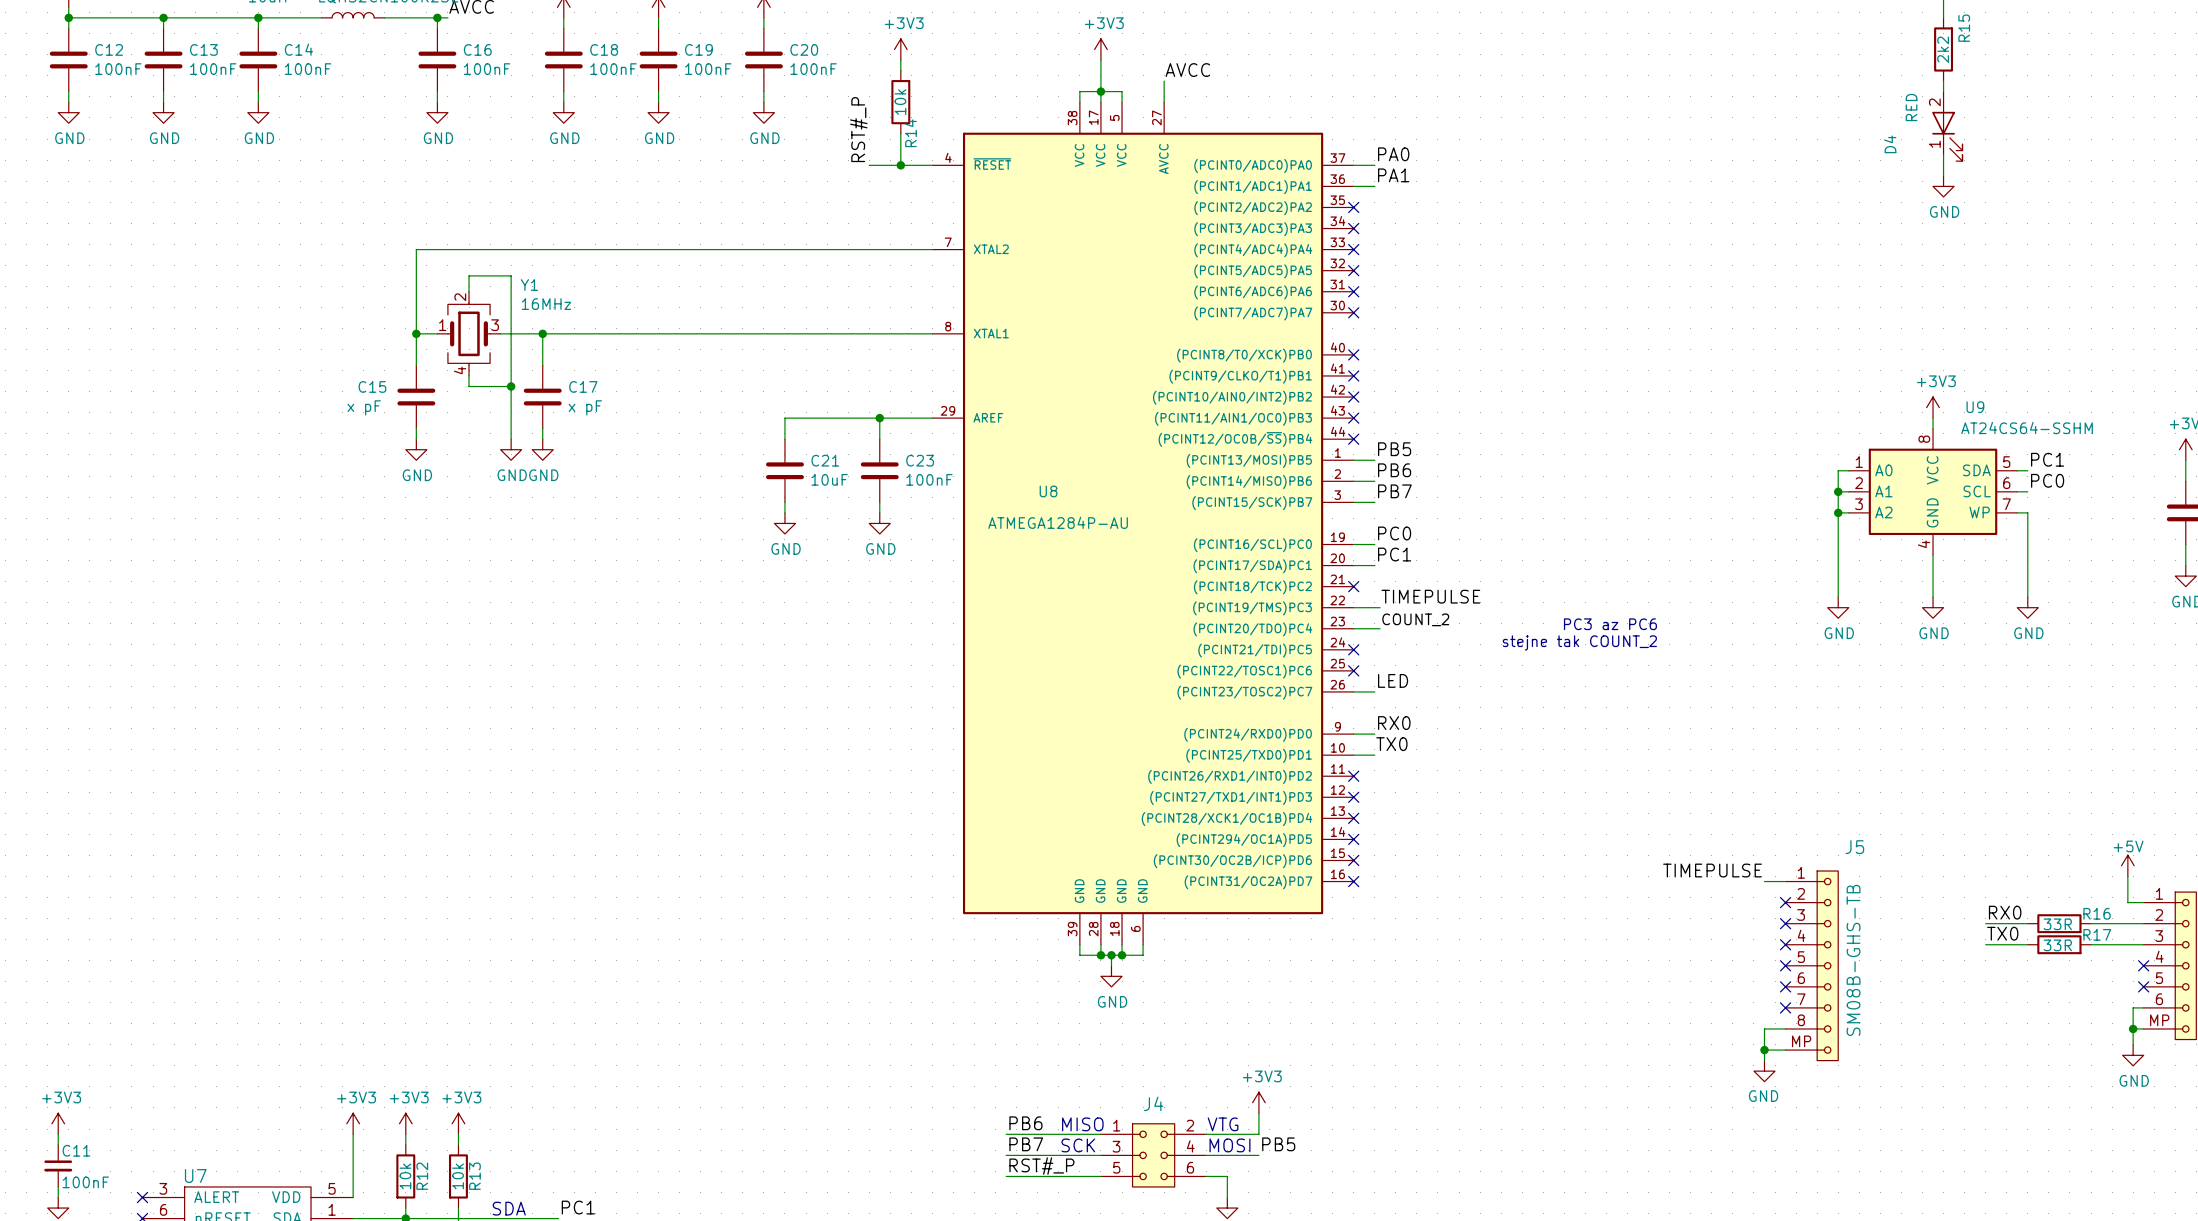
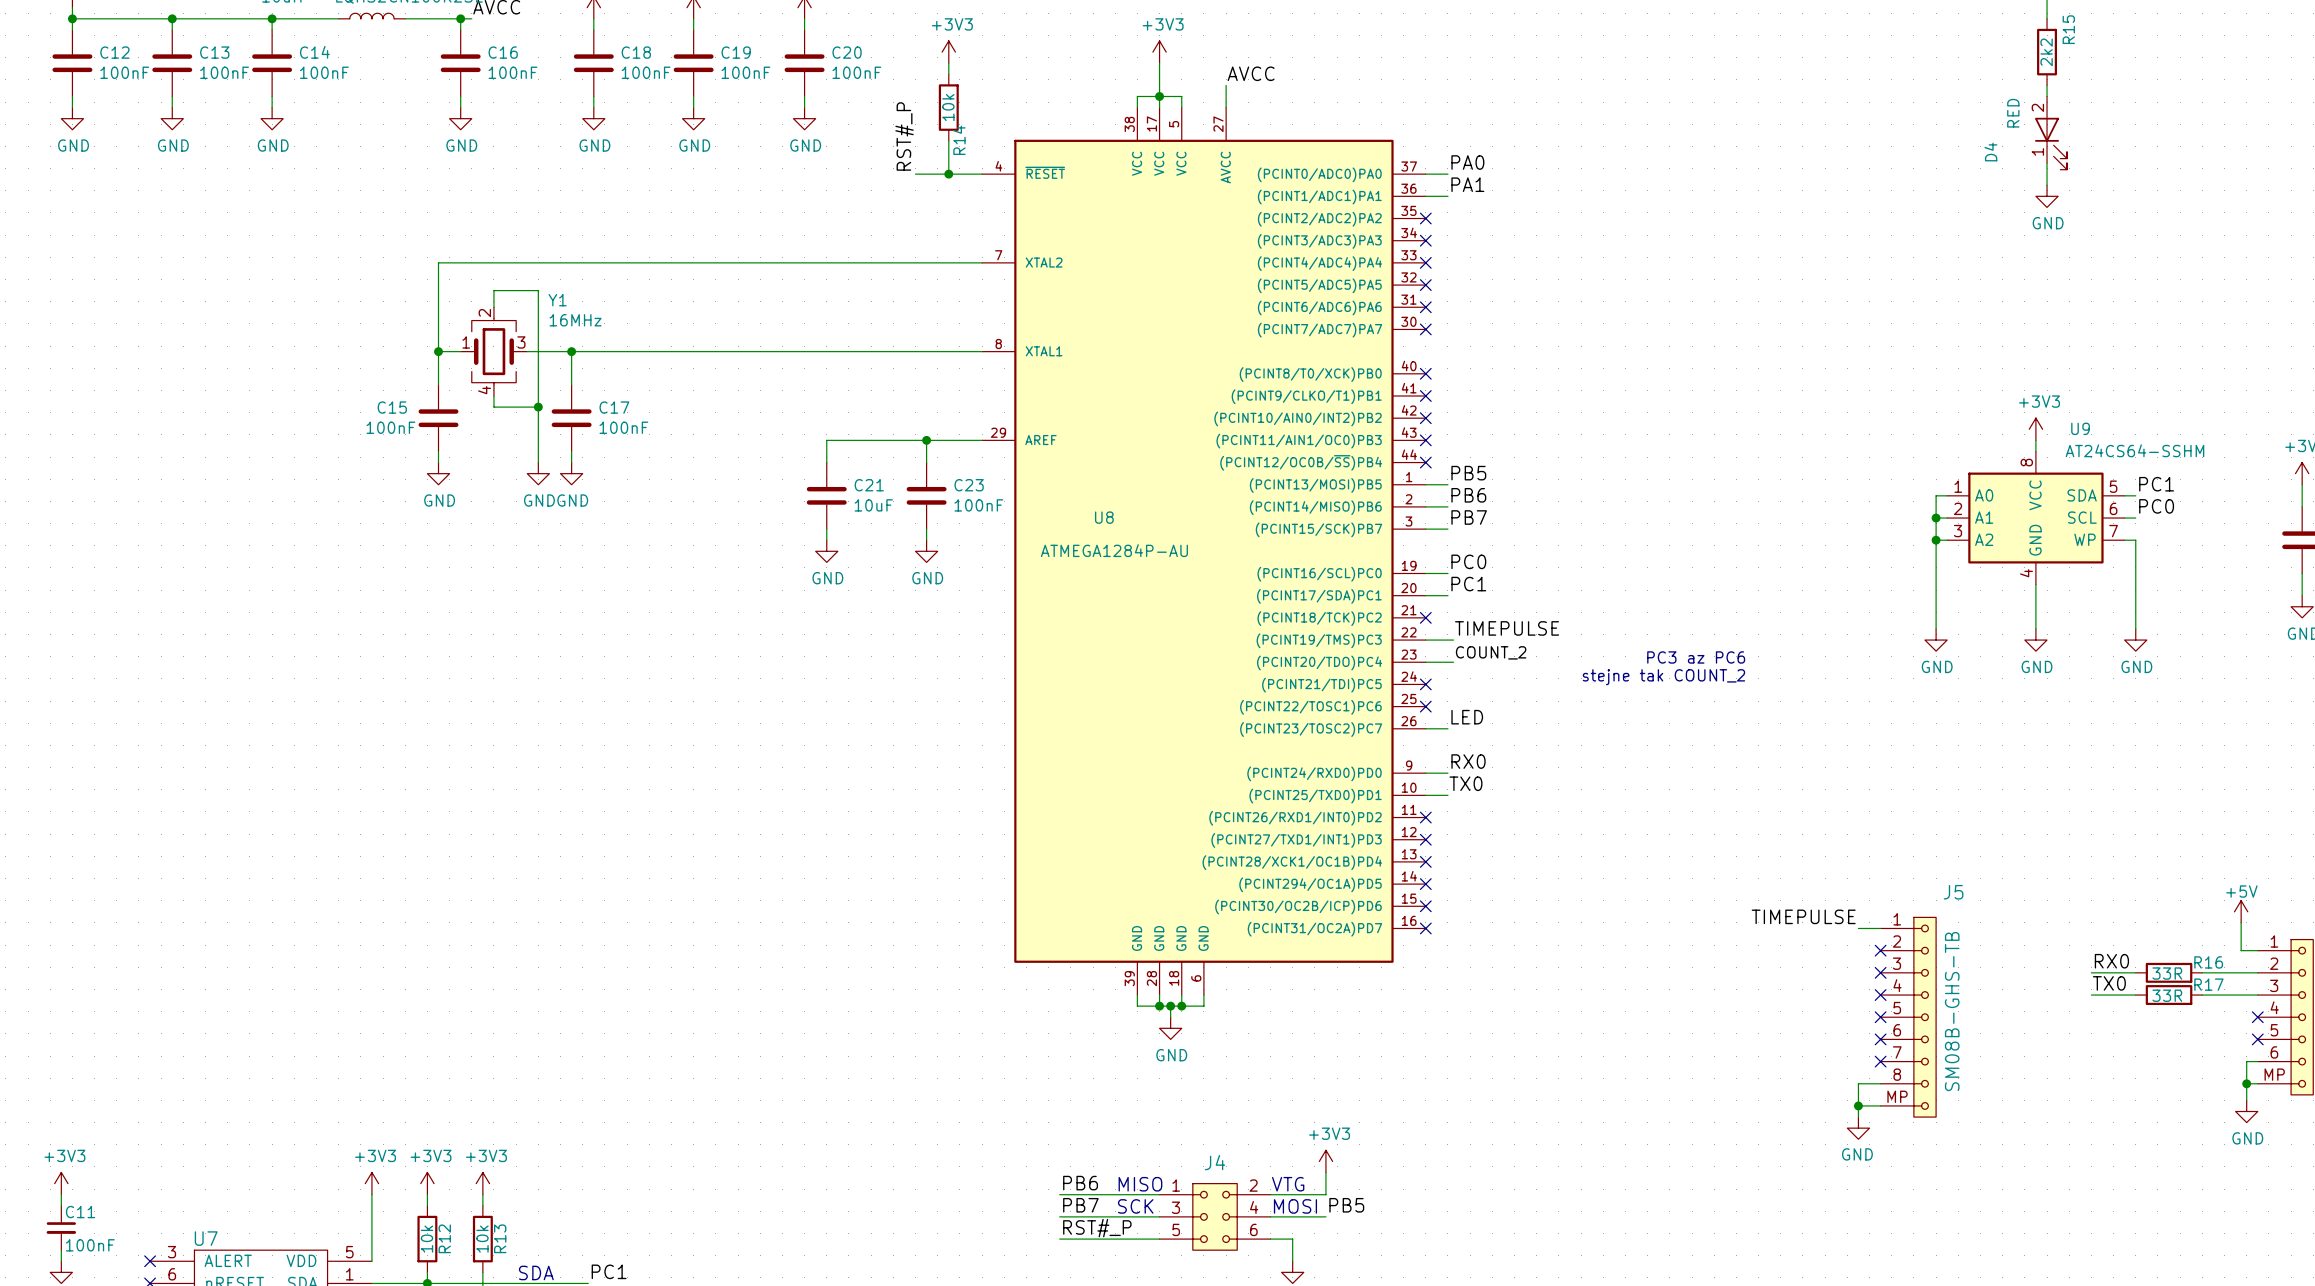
C15 value: x pF (364, 407) -> 100nF (390, 427)
C17 value: x pF (585, 407) -> 100nF (623, 427)

